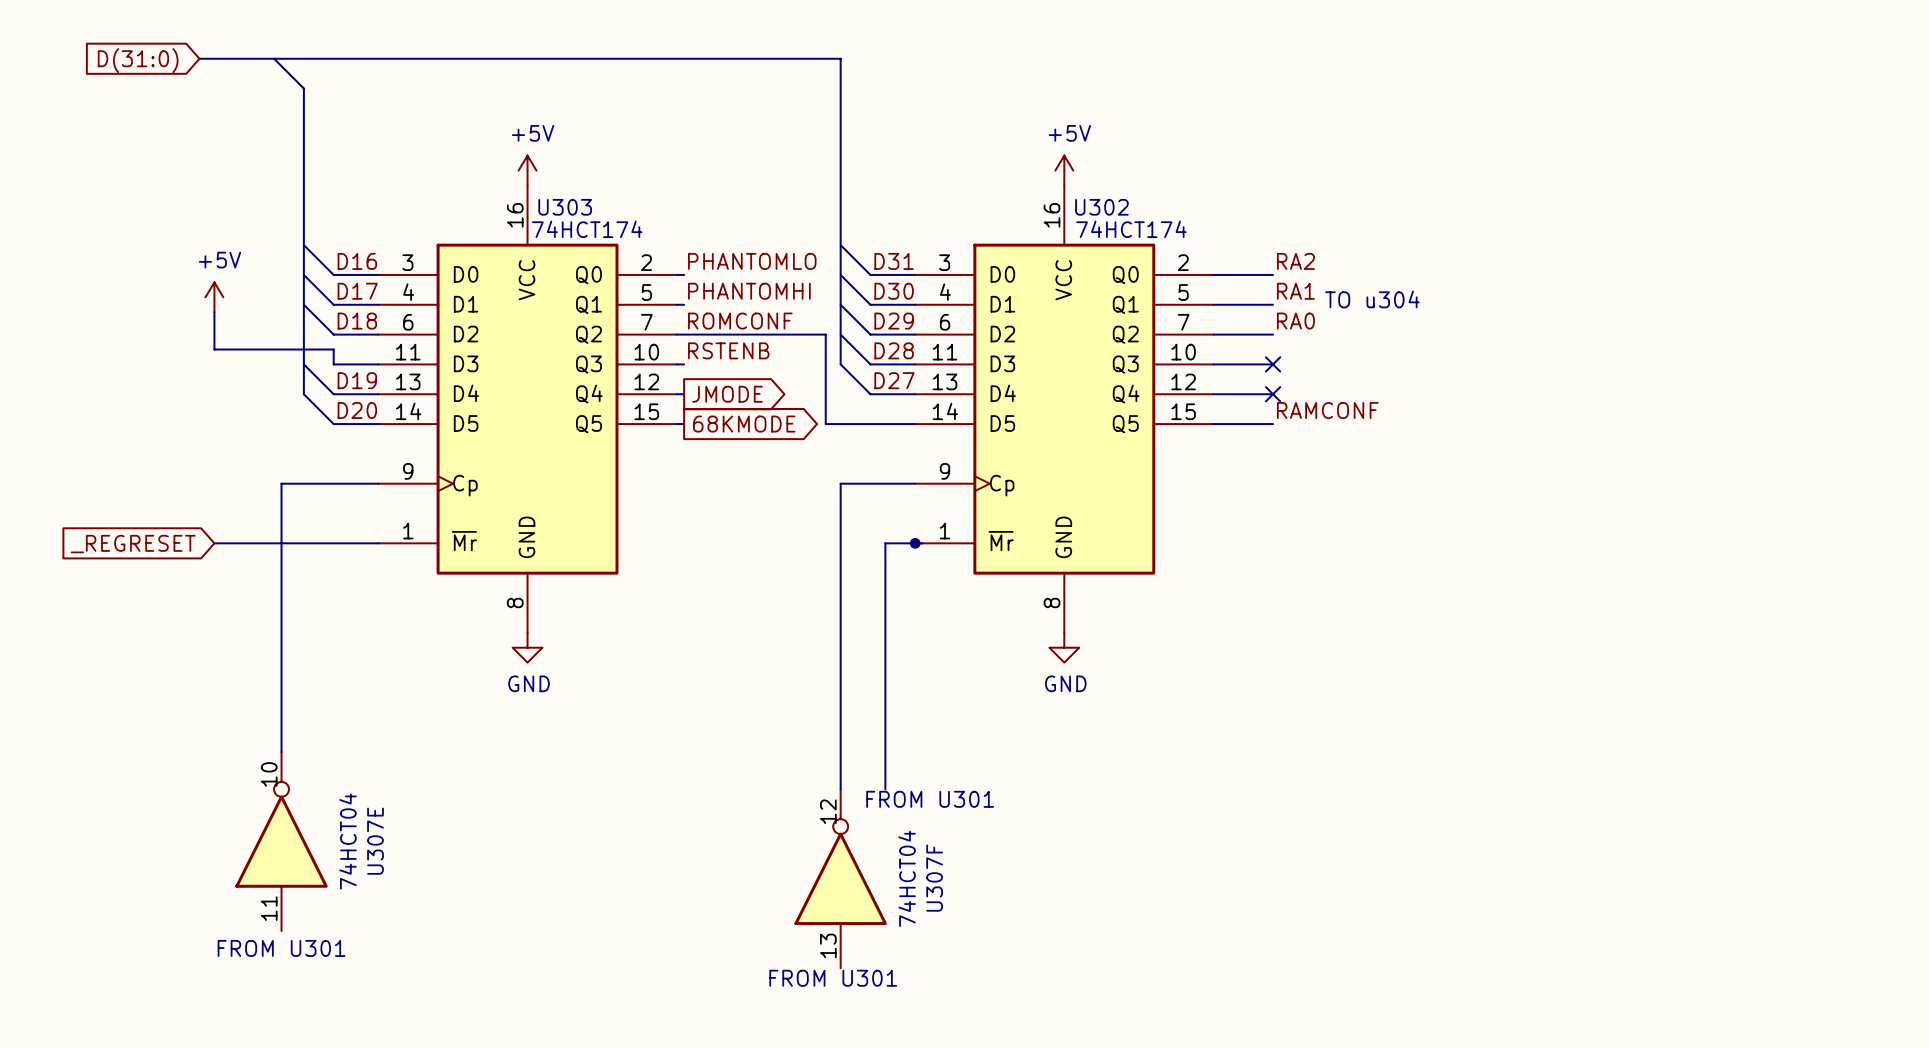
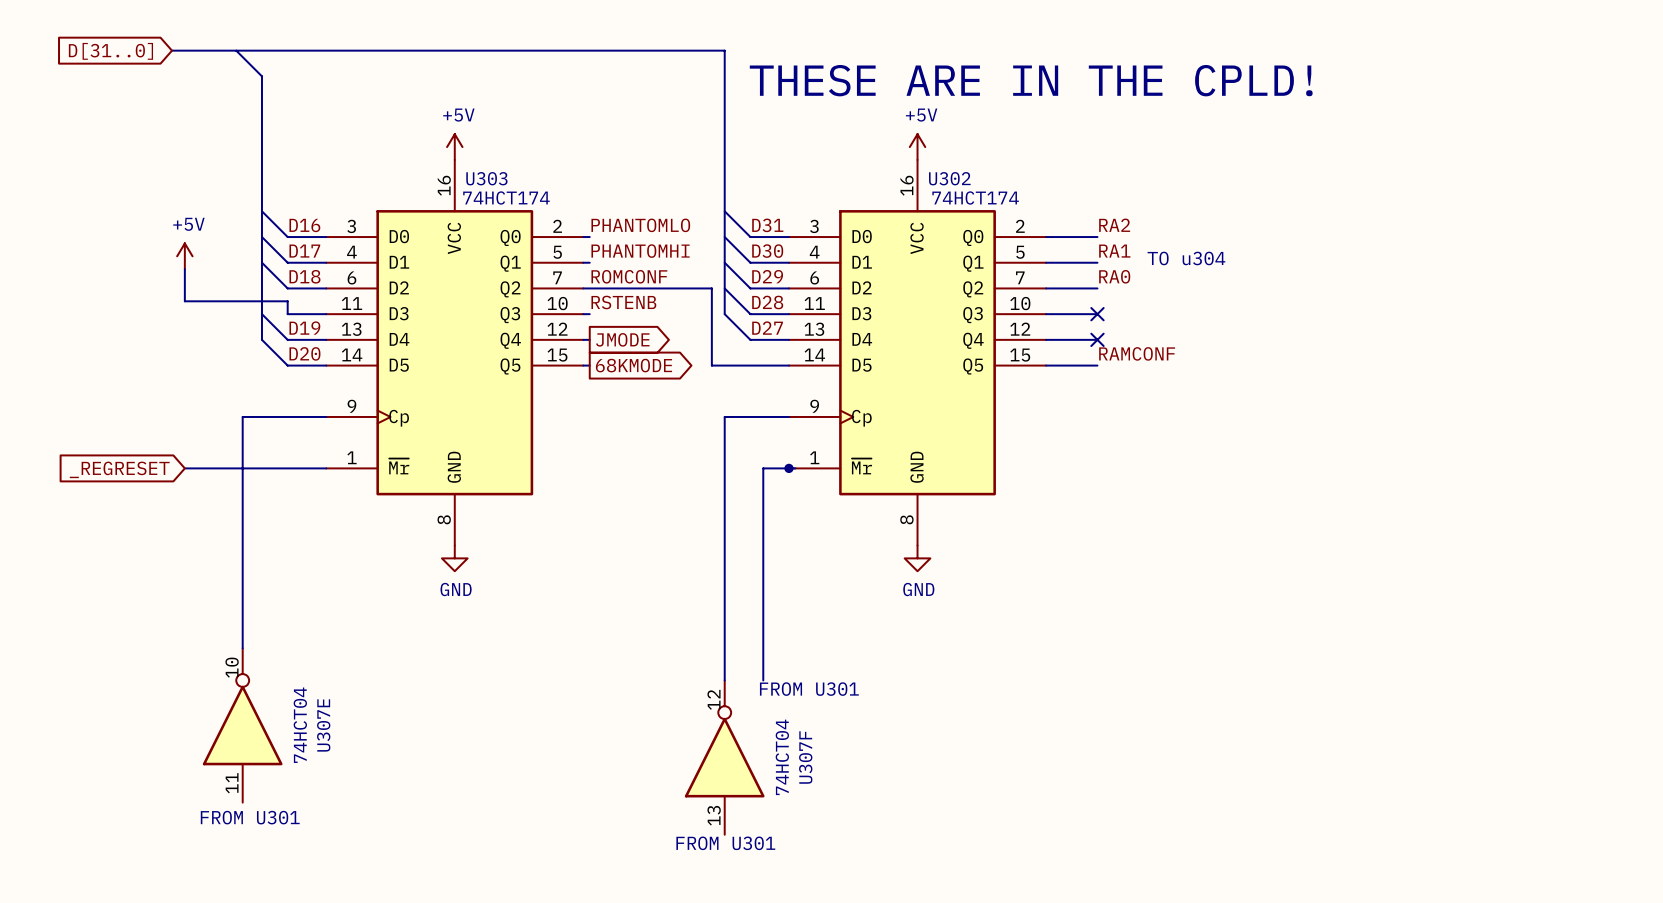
global label: D(31:0) (138, 60) -> D[31..0] (110, 51)
text: none -> THESE ARE IN THE CPLD! (1031, 80)

